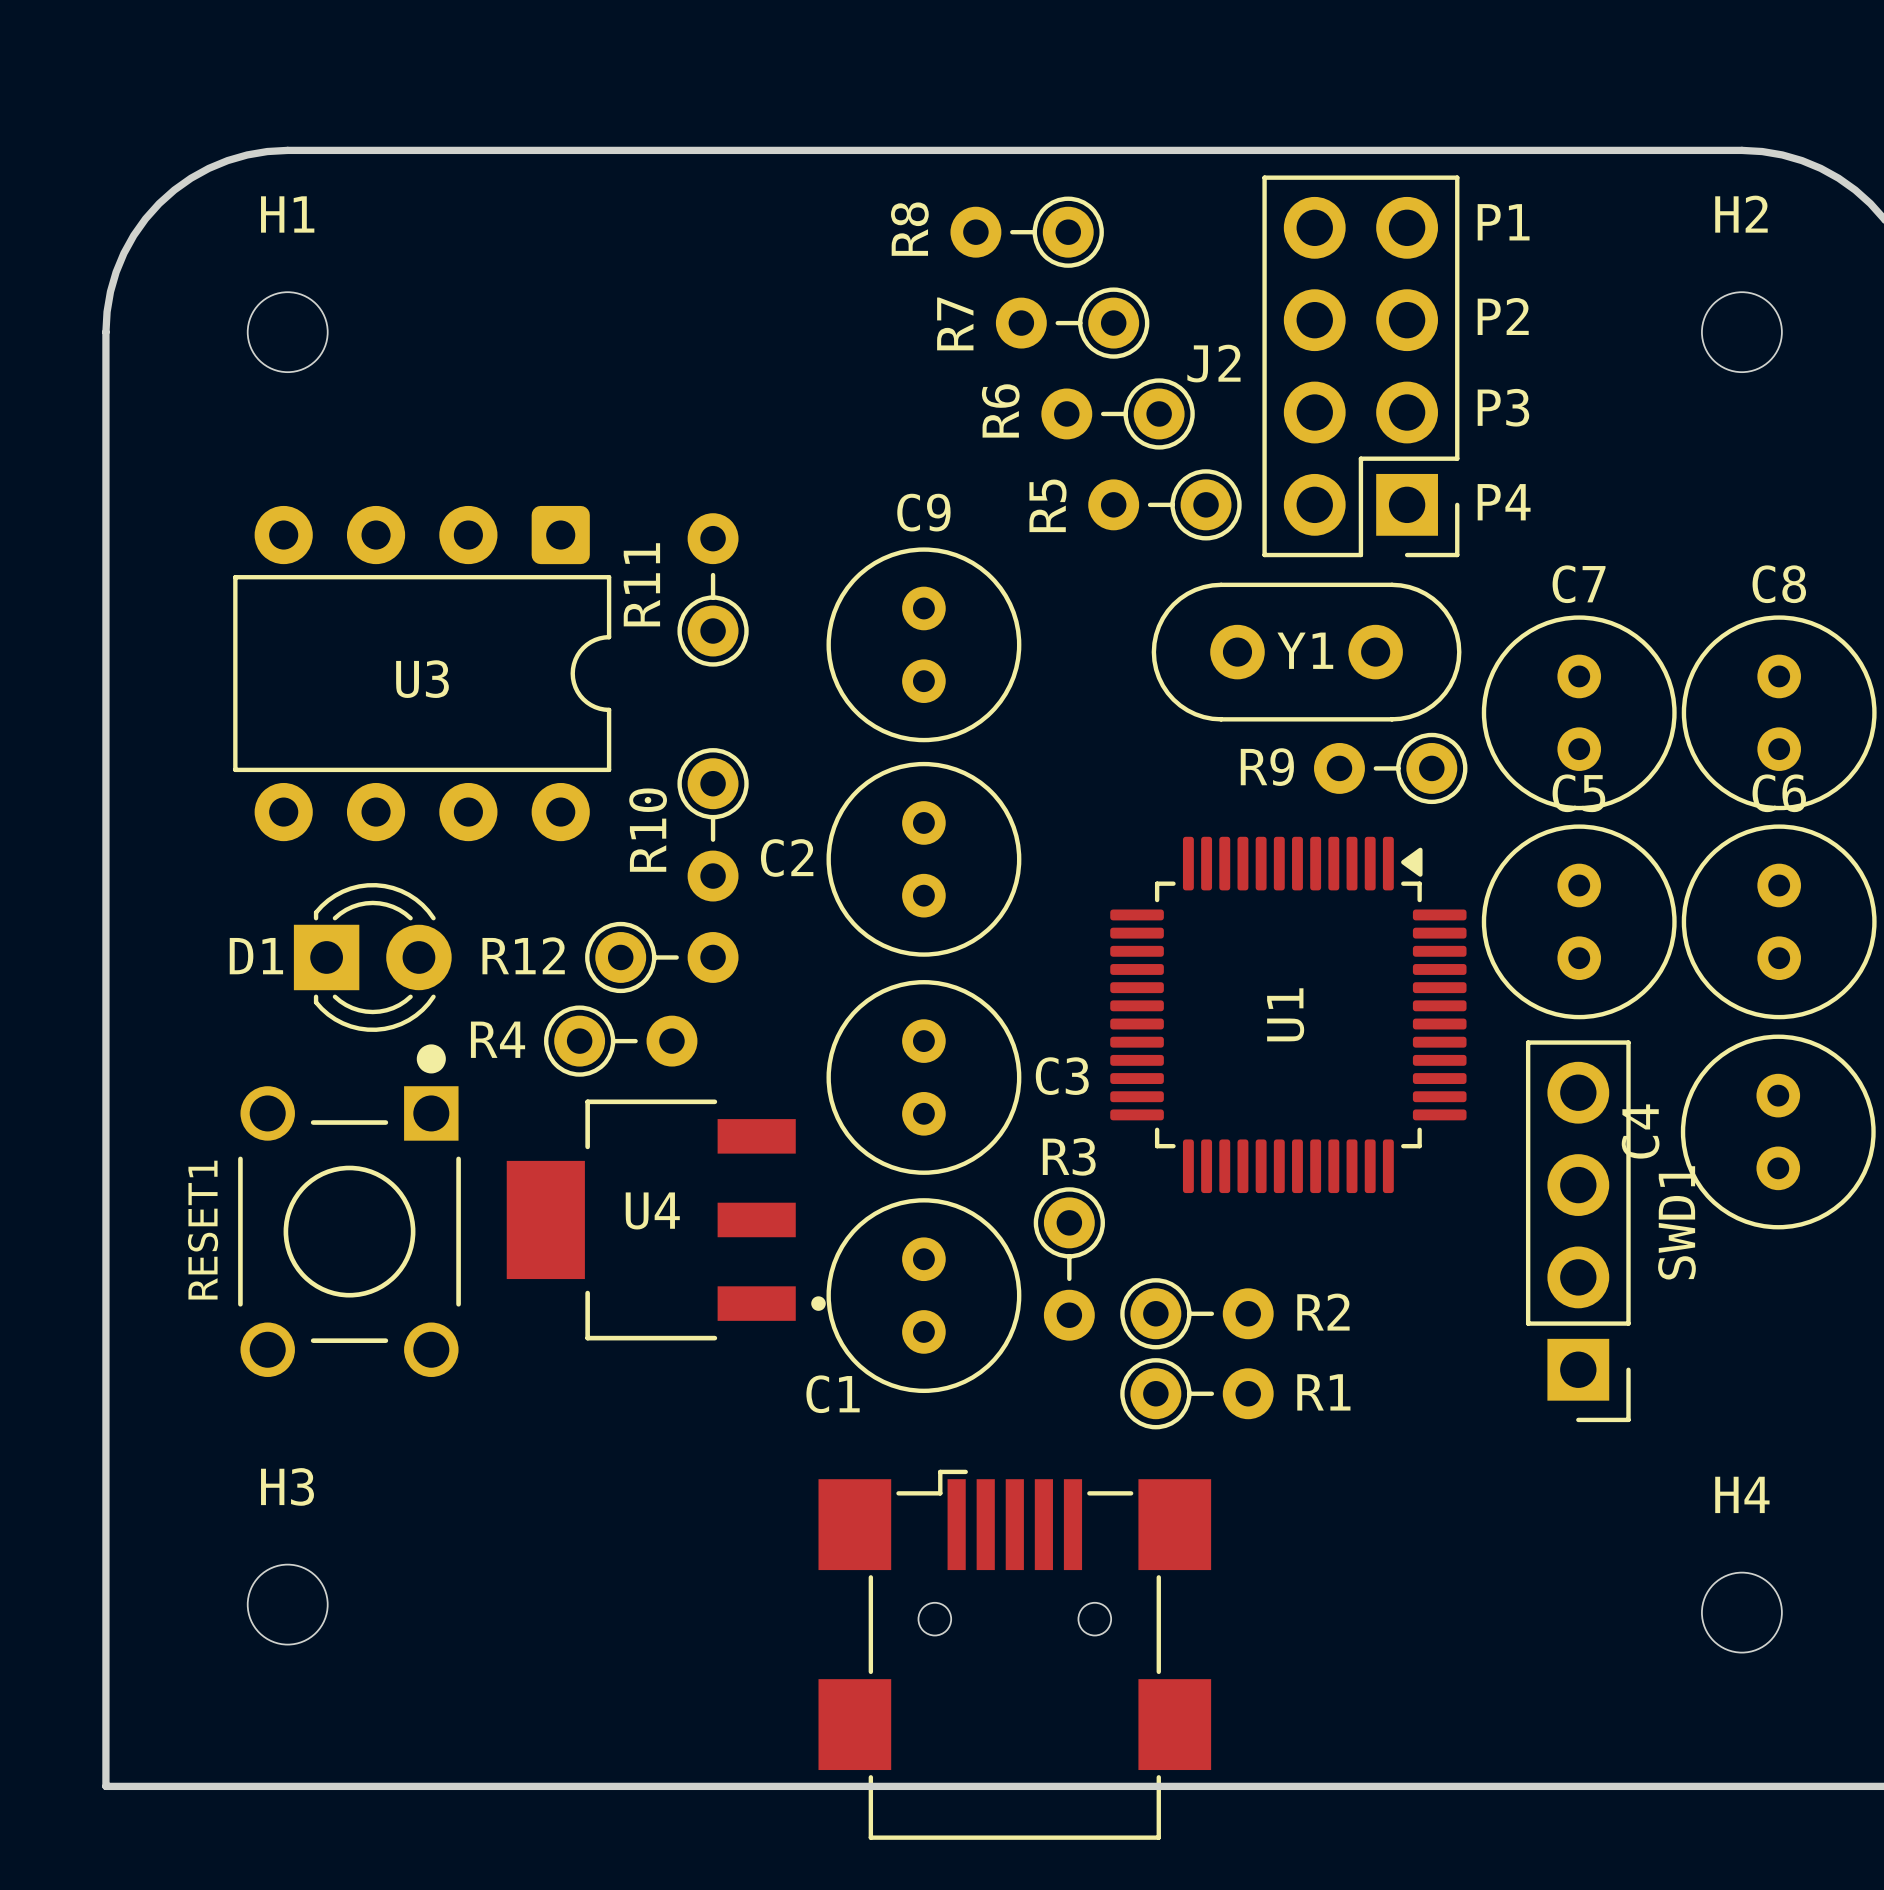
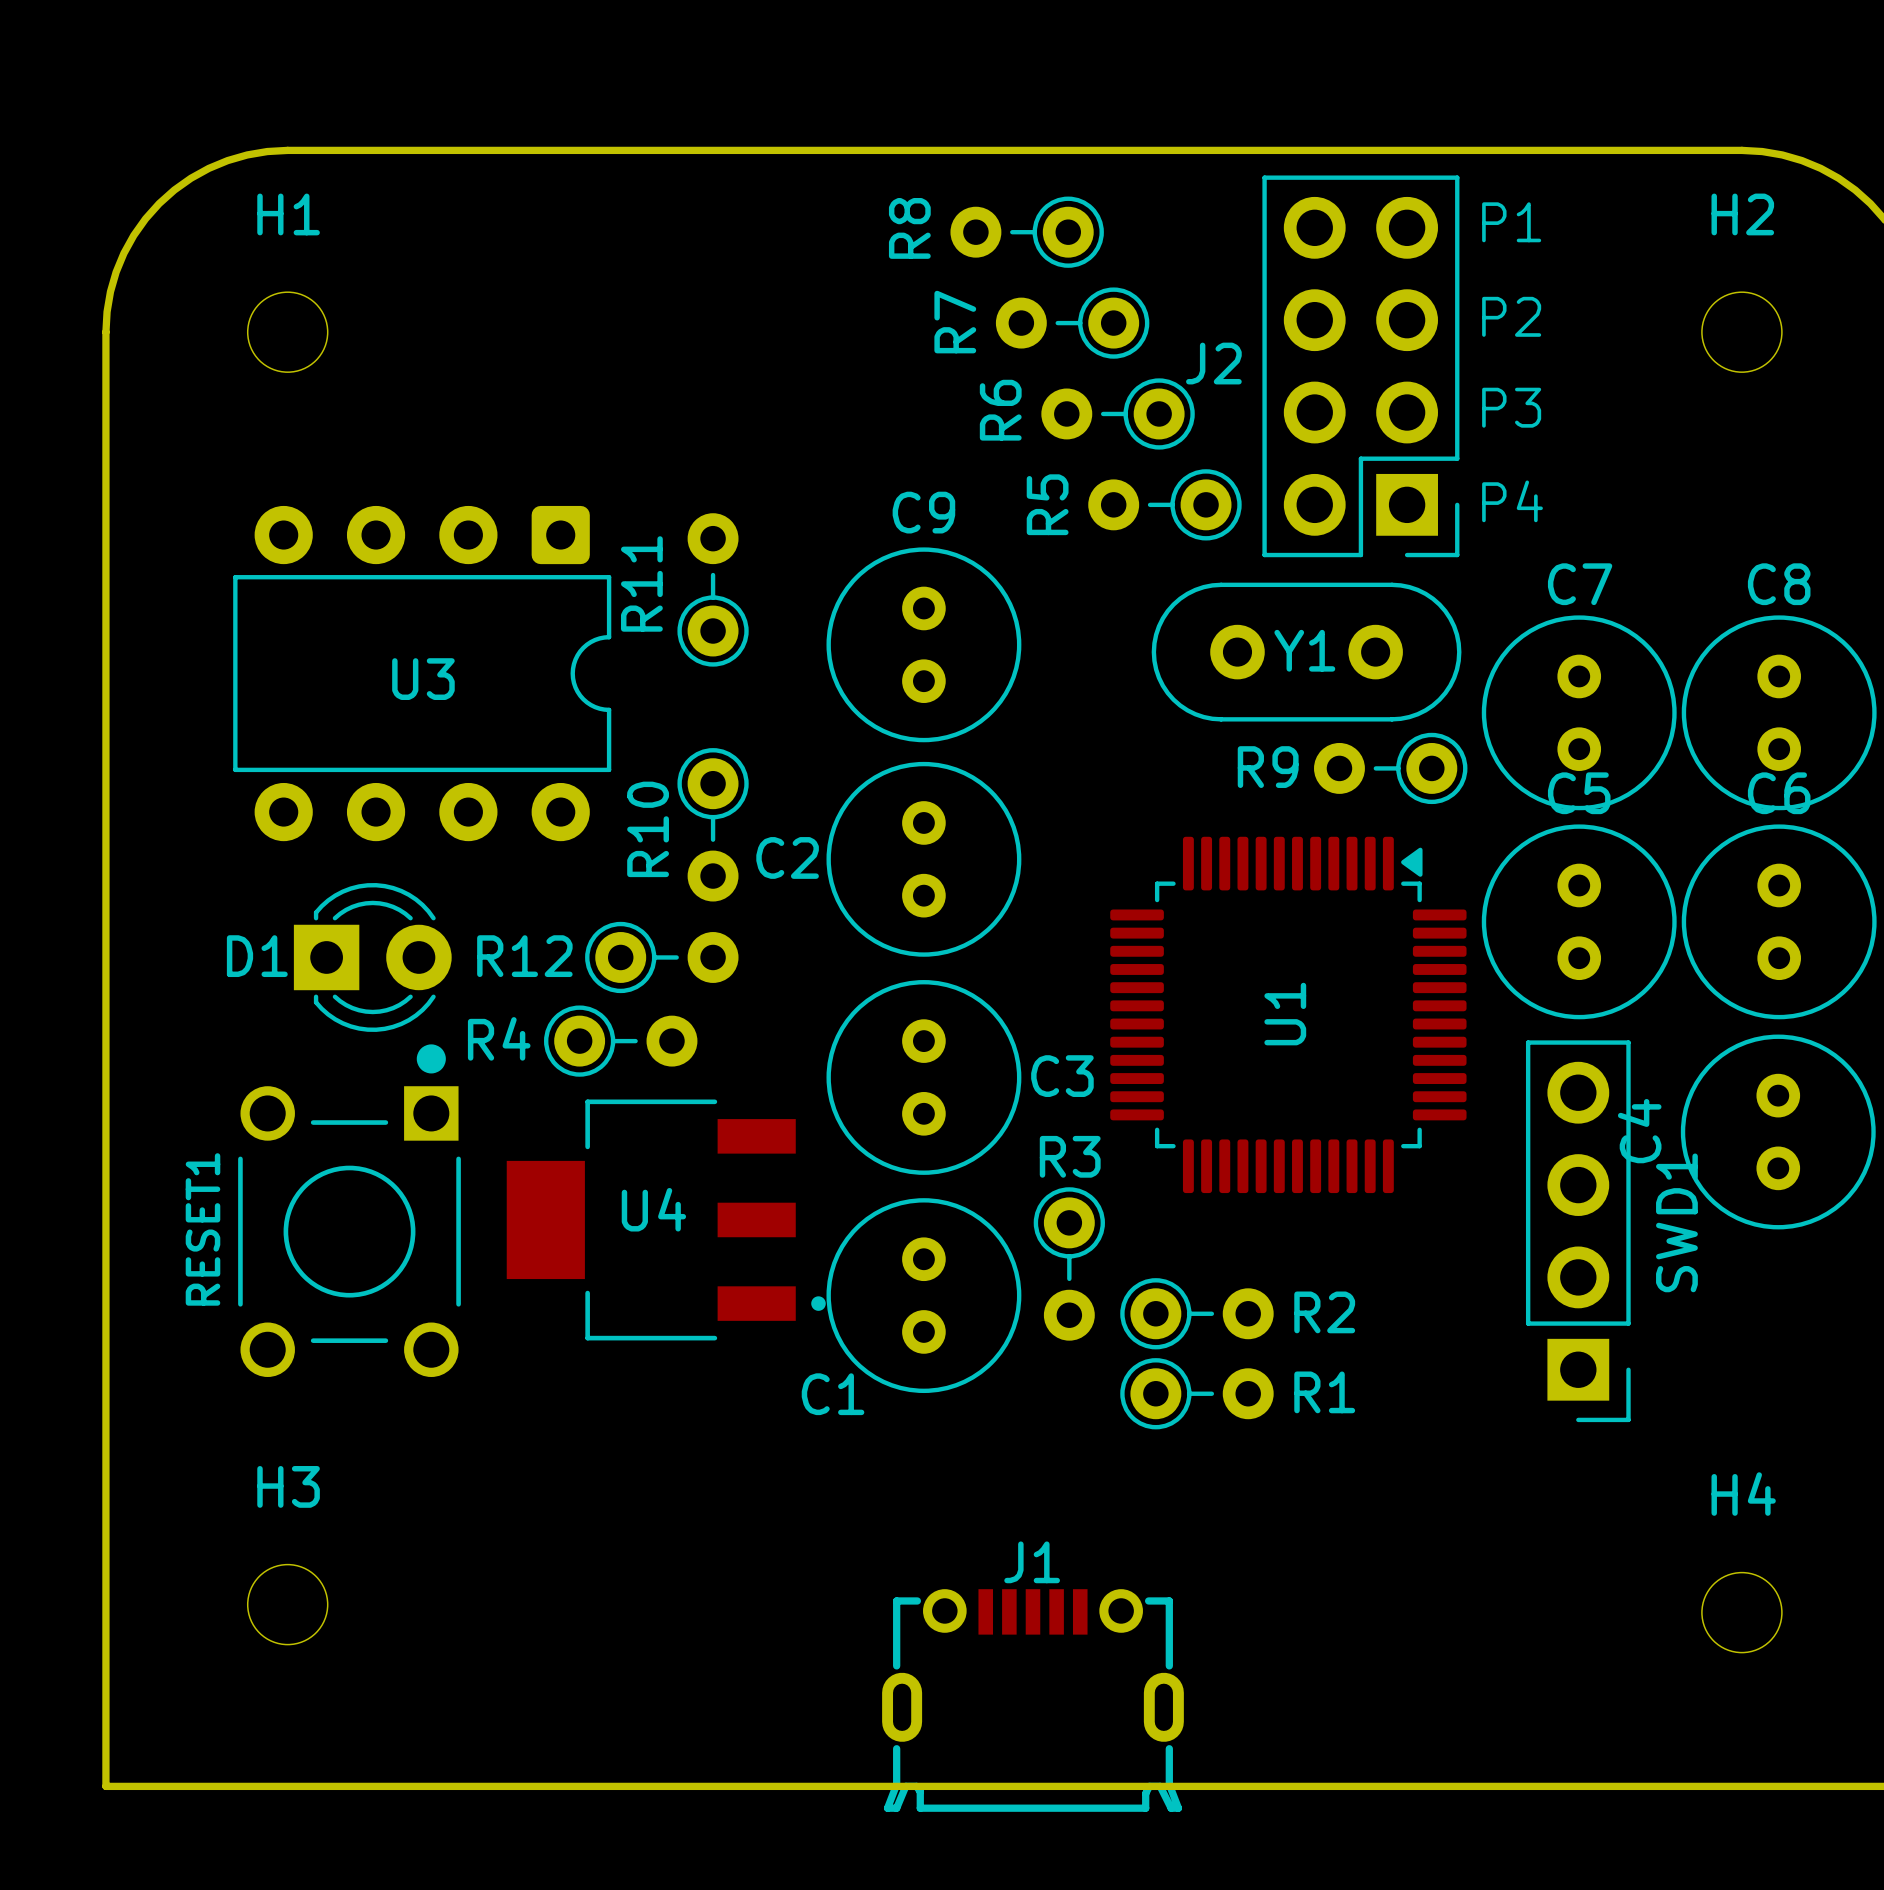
part: (1014, 1654) -> none
J1: none -> (1032, 1700)

